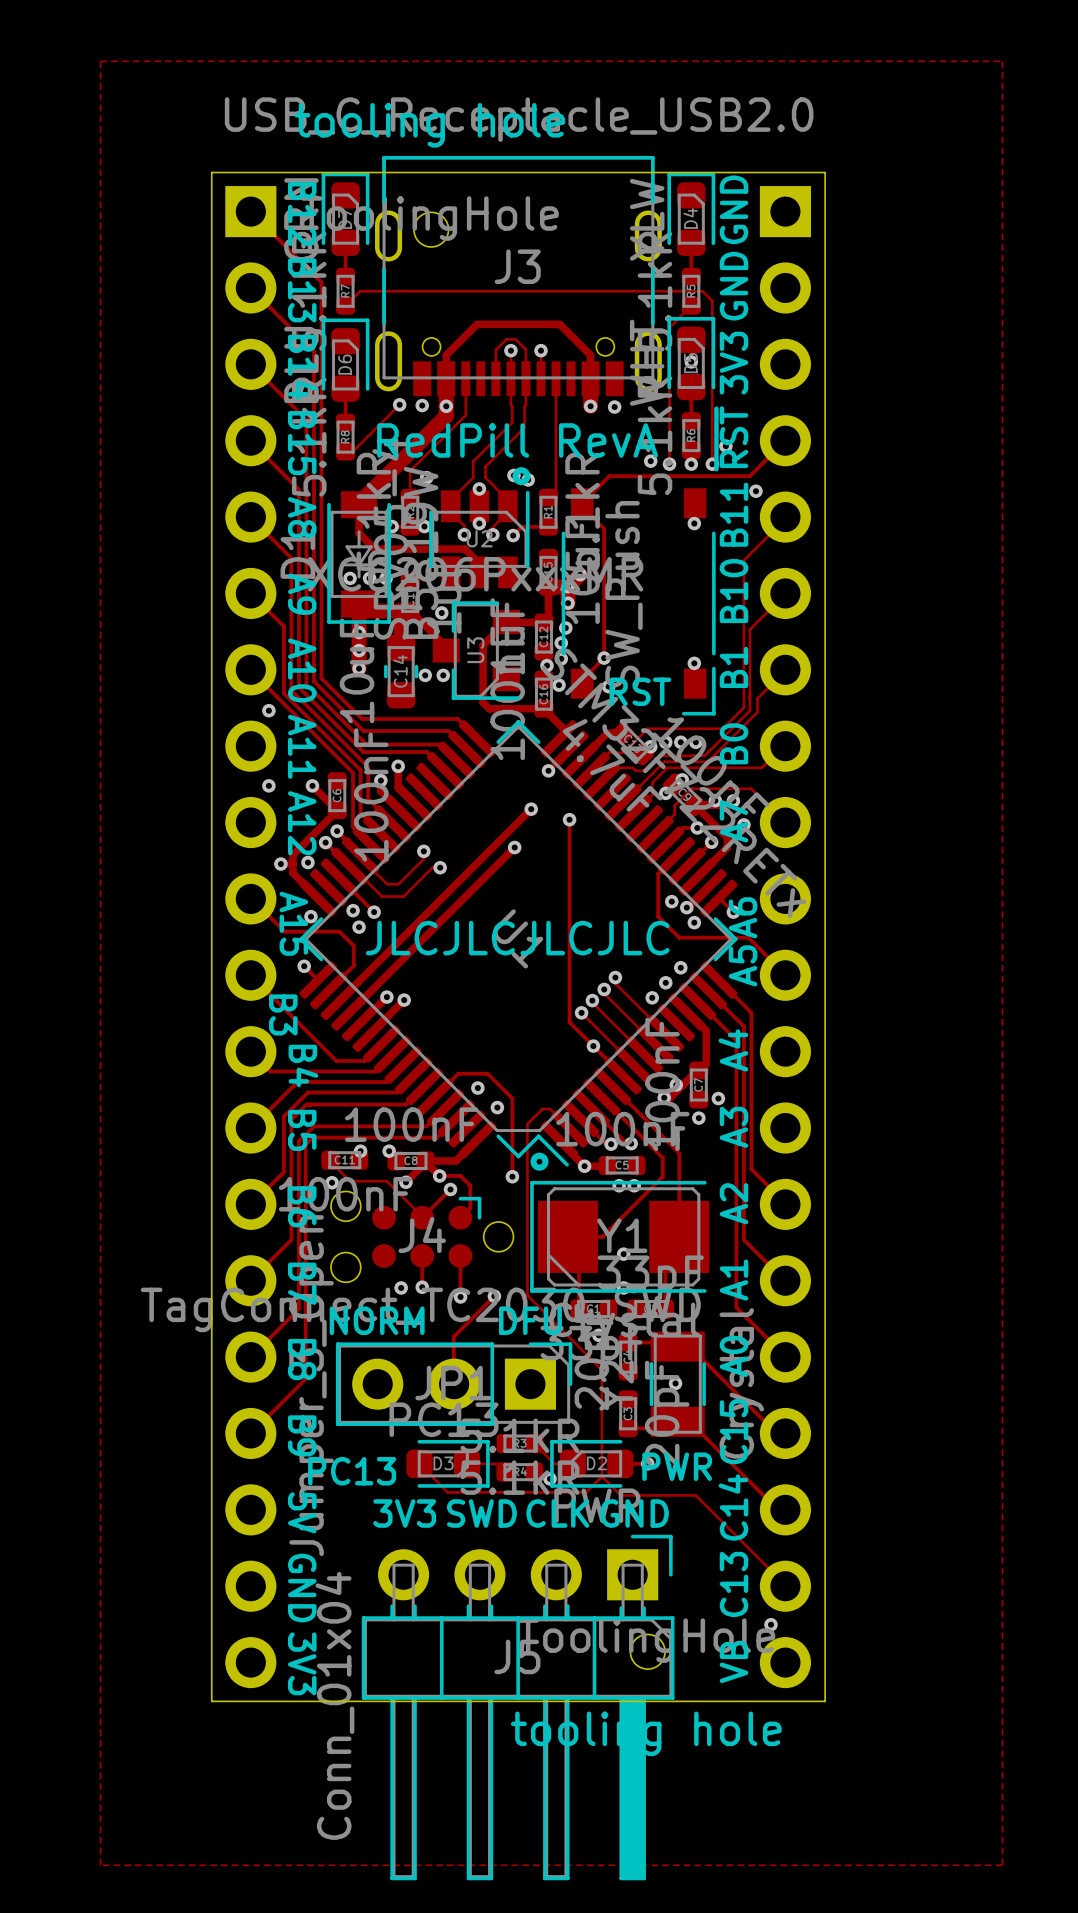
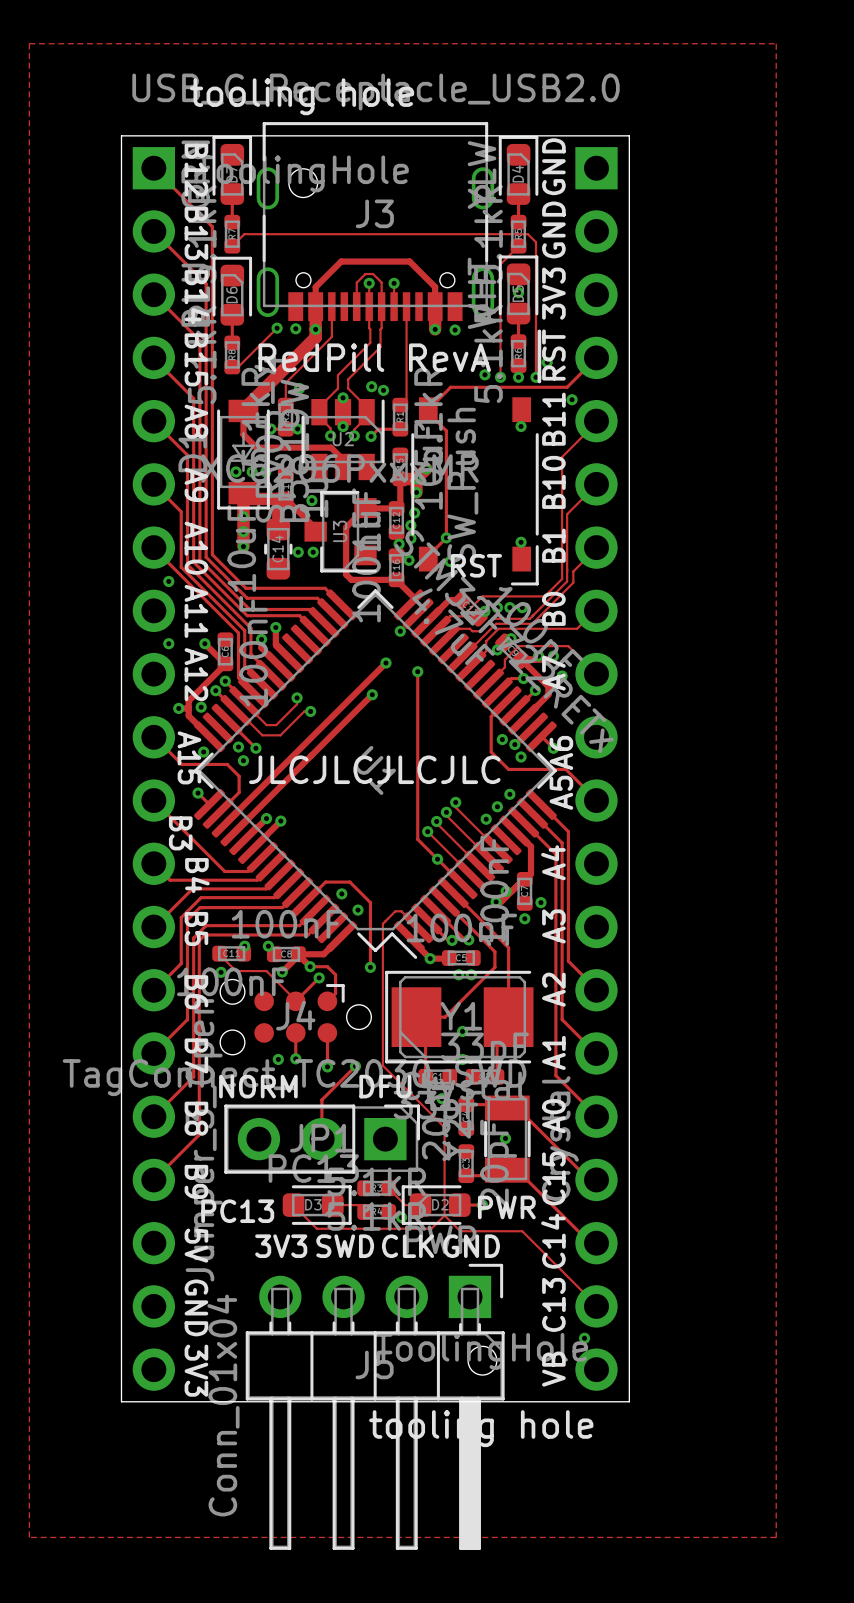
drawing: [512, 467, 531, 486] -> none
drawing: [530, 1152, 549, 1171] -> none

